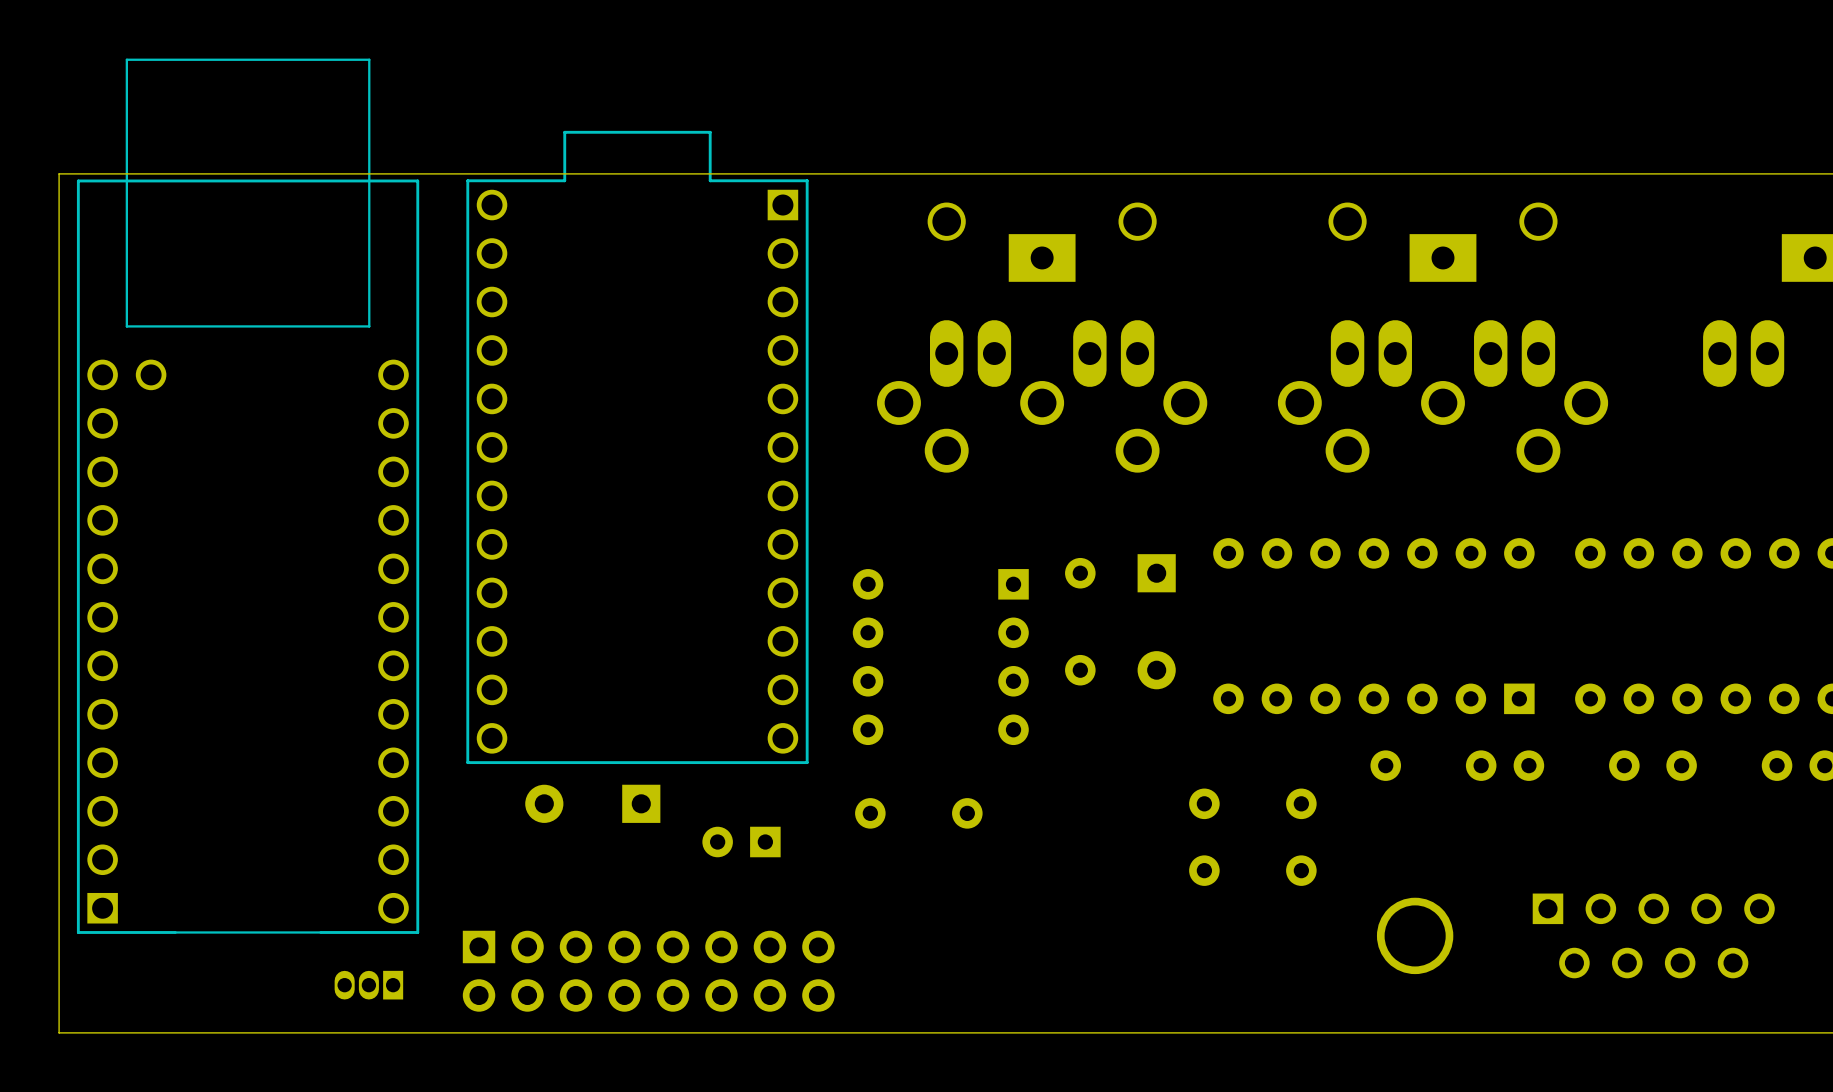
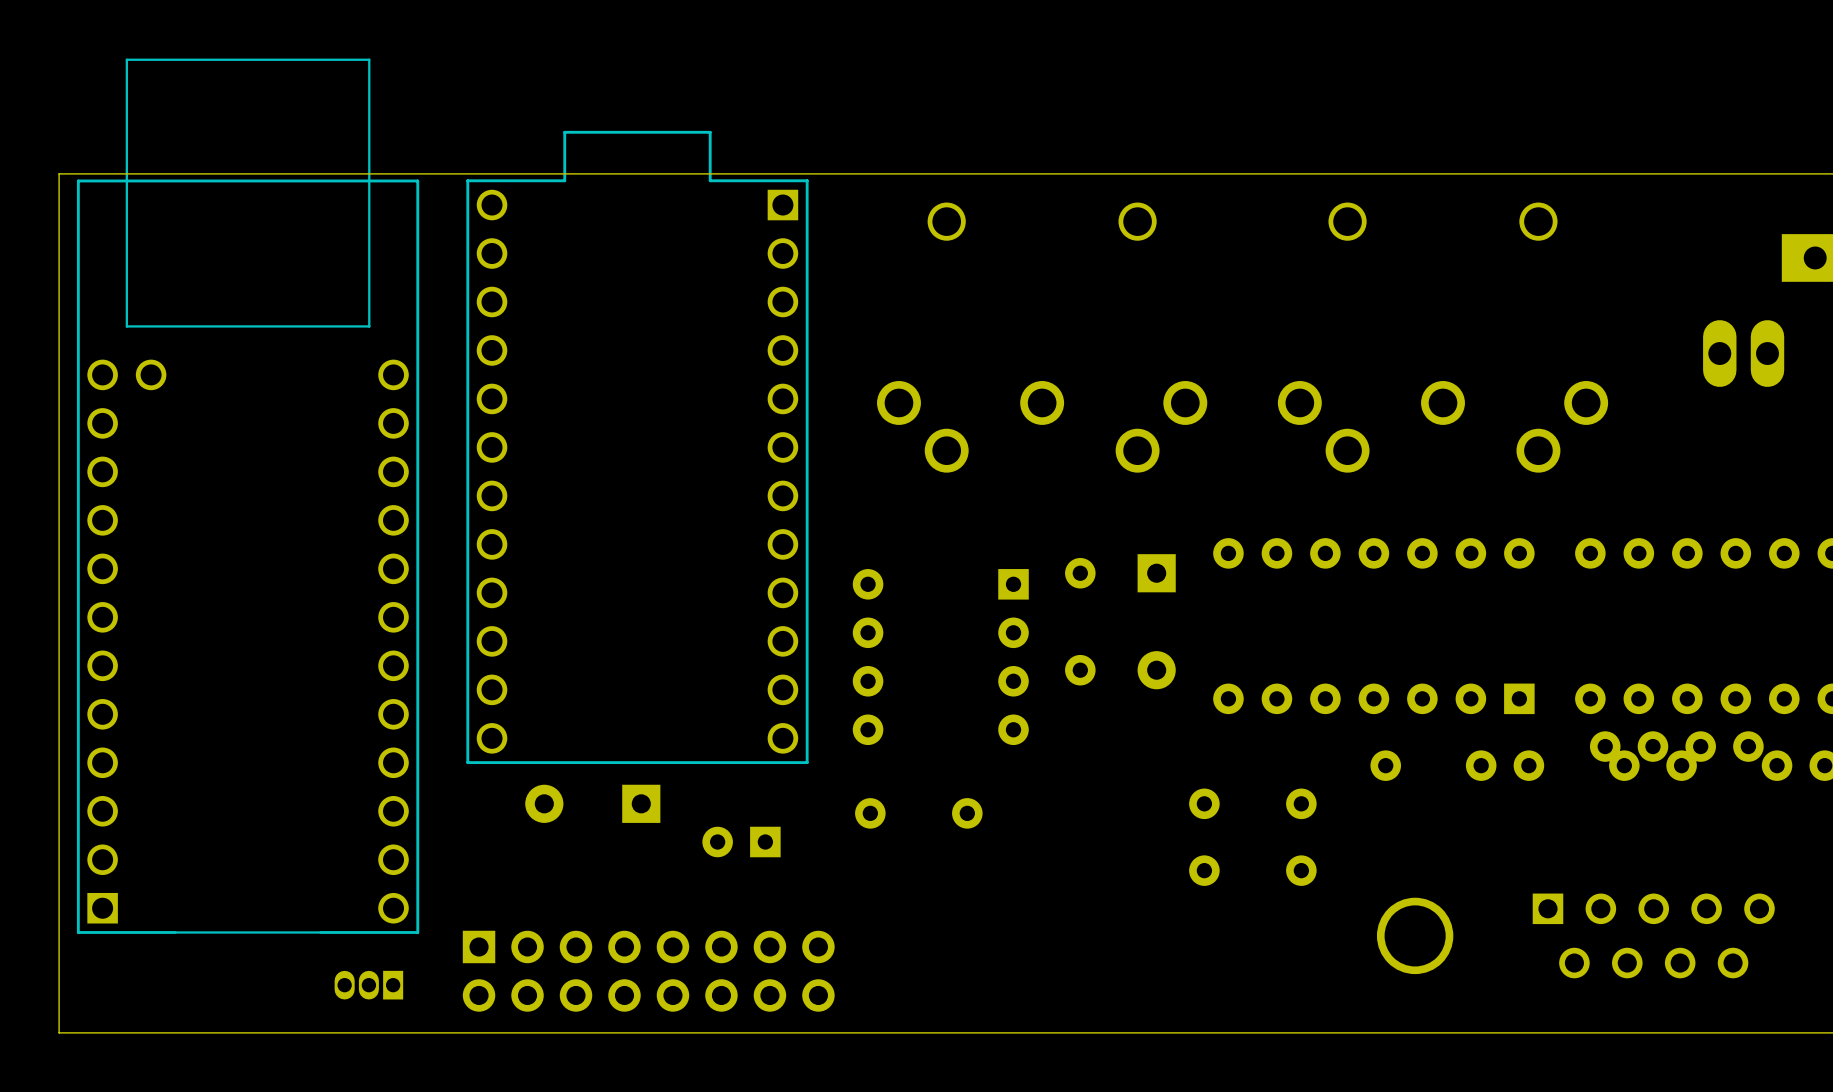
part: (1042, 310) -> none
part: (1443, 310) -> none
part: none -> (1629, 746)
part: none -> (1724, 746)

